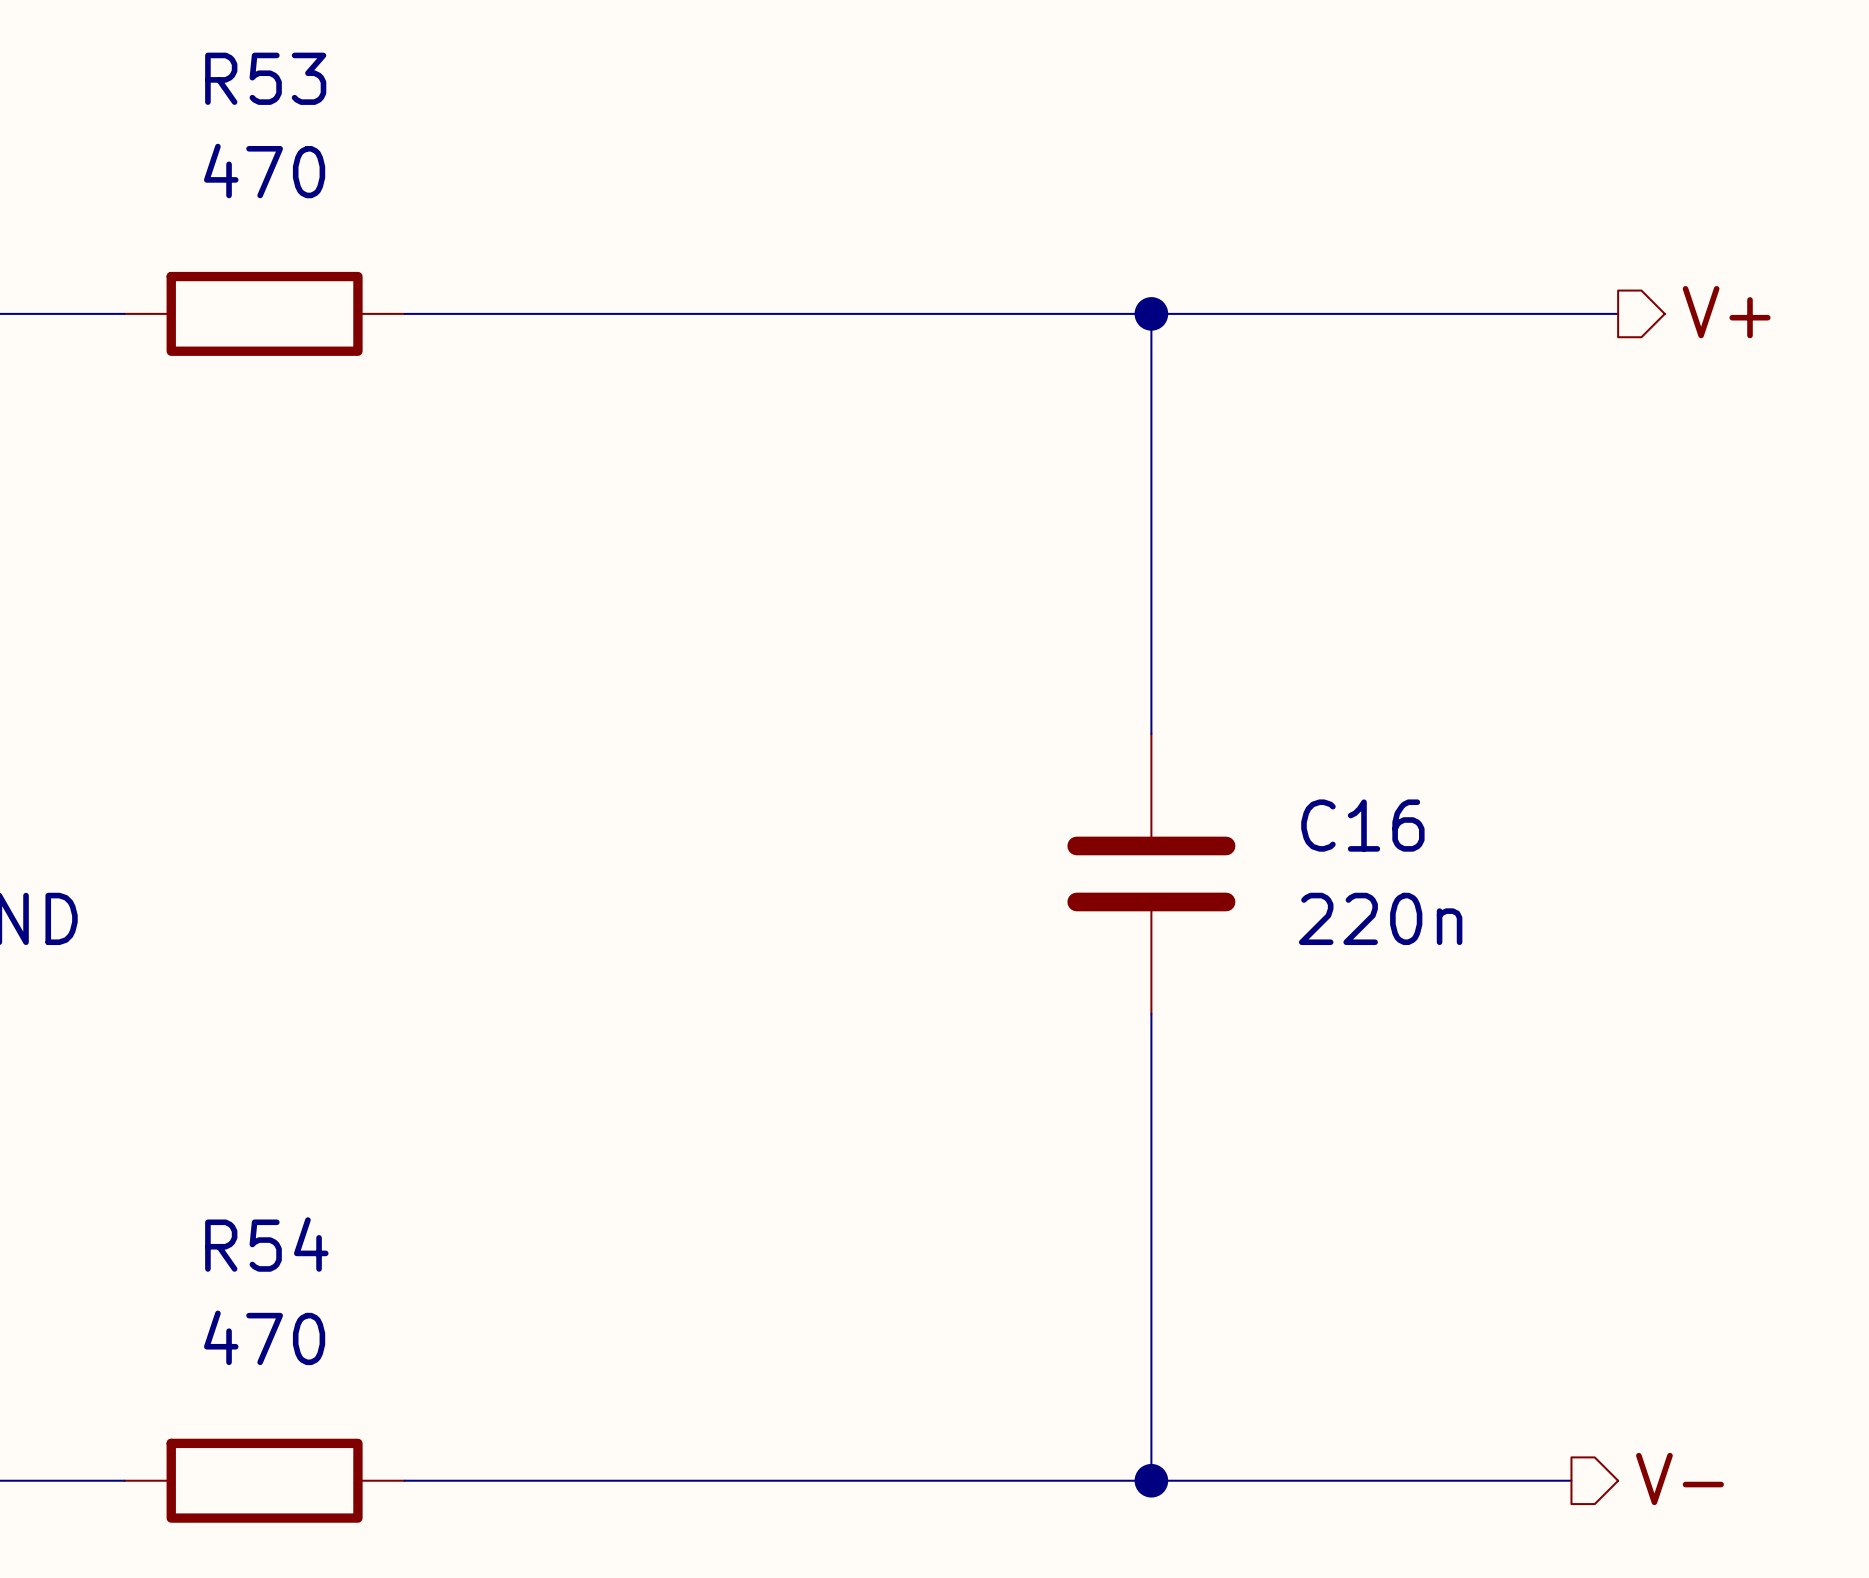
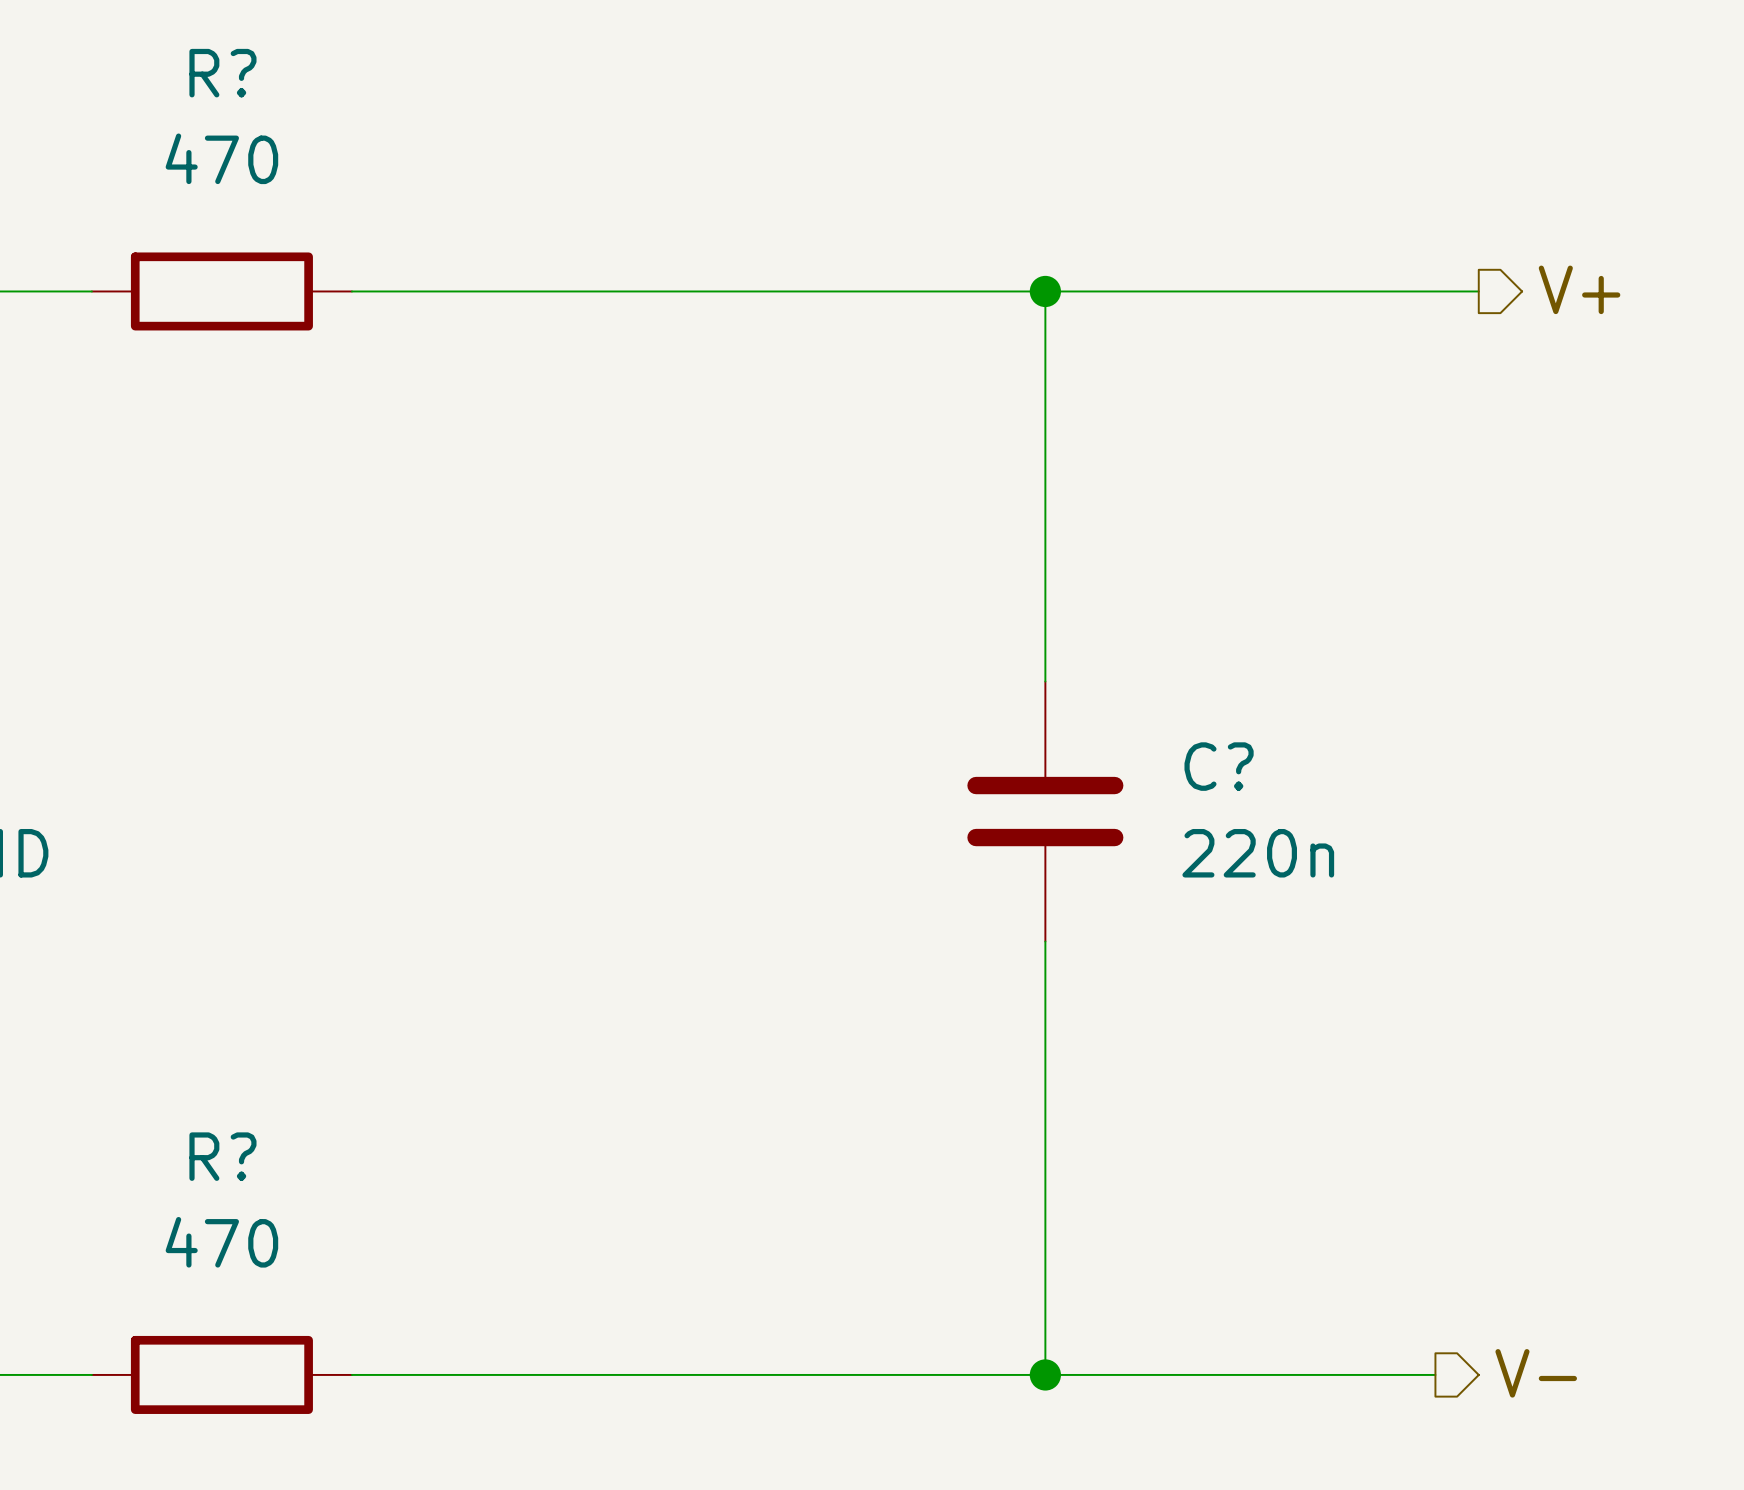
R53 name: R53 (265, 78) -> R? (222, 73)
C16 name: C16 (1362, 825) -> C? (1219, 766)
R54 name: R54 (266, 1244) -> R? (222, 1156)

